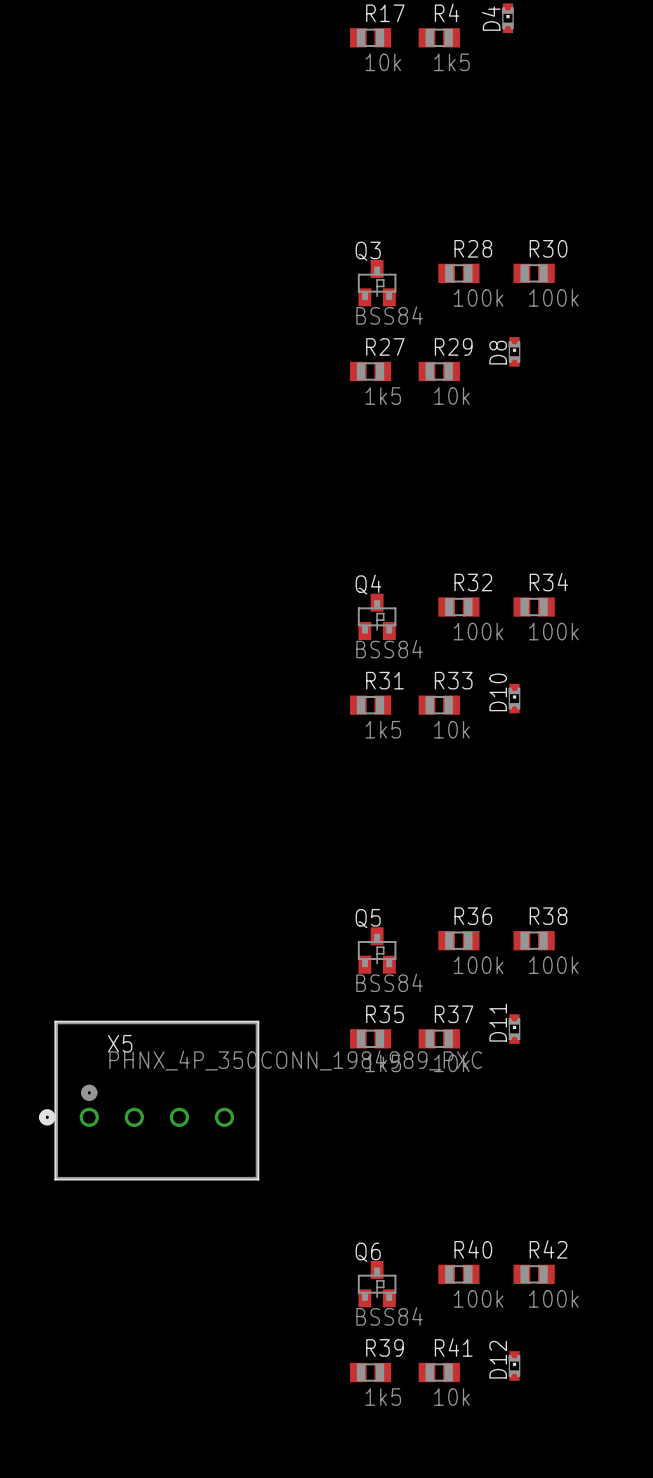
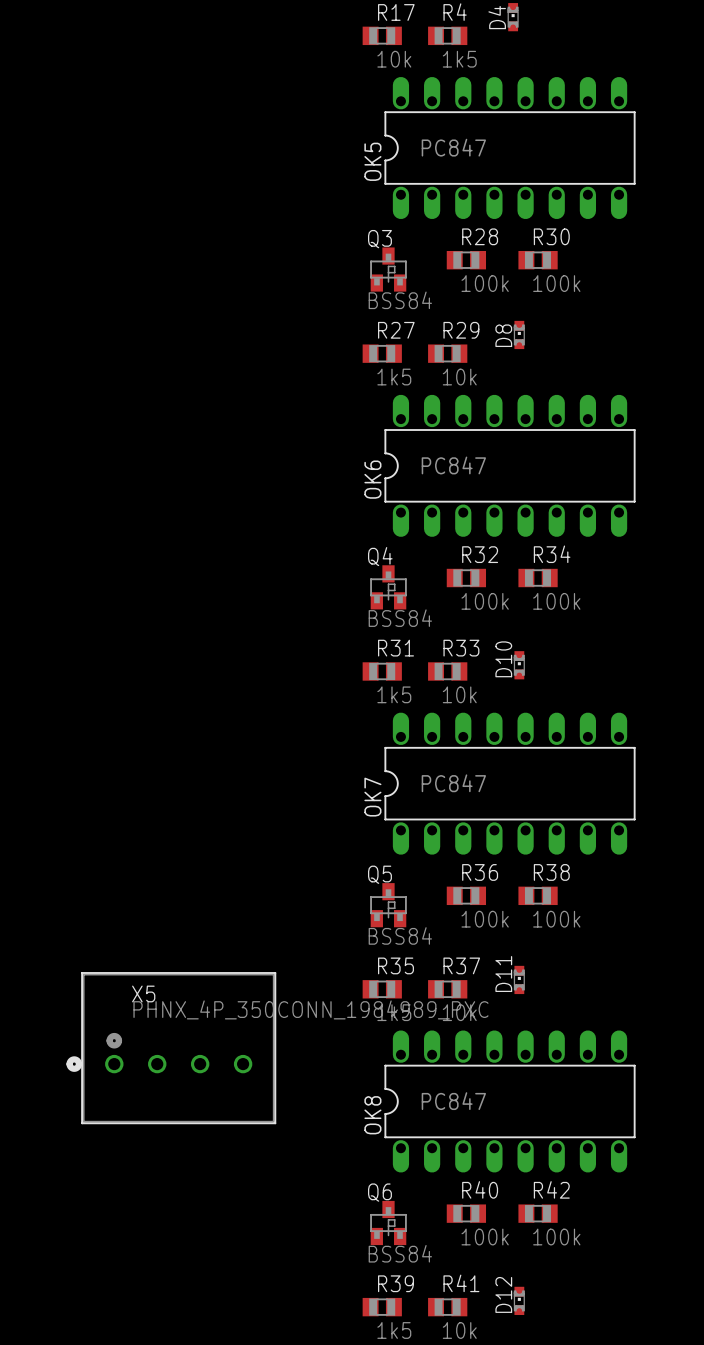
OK5: none -> PC847 (510, 148)
OK6: none -> PC847 (510, 465)
OK7: none -> PC847 (510, 783)
OK8: none -> PC847 (510, 1101)

